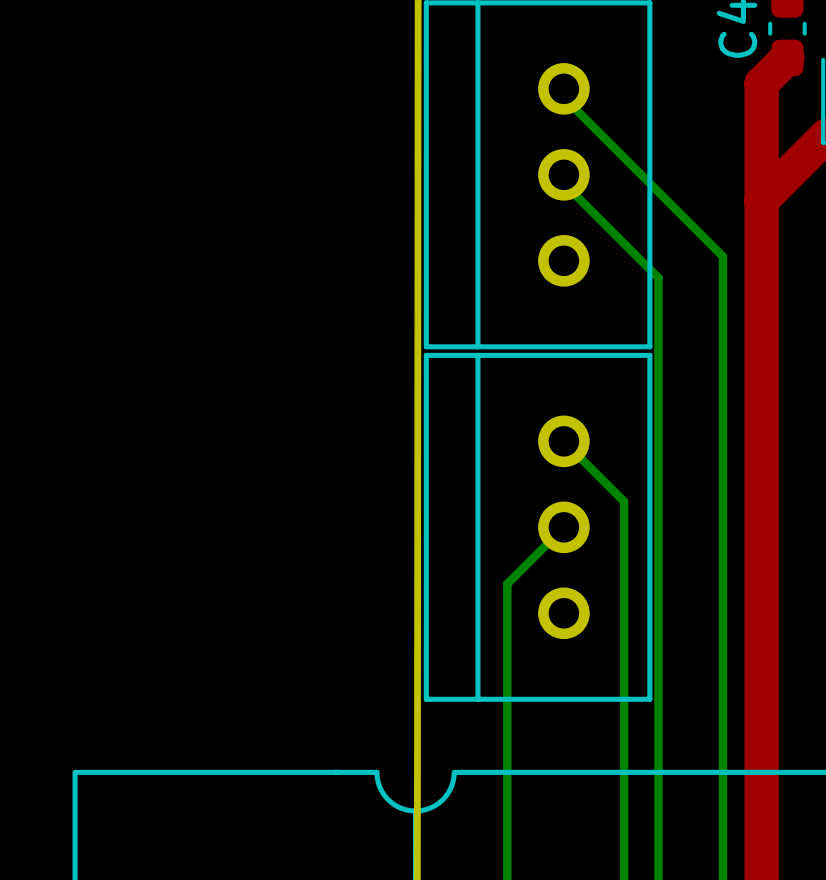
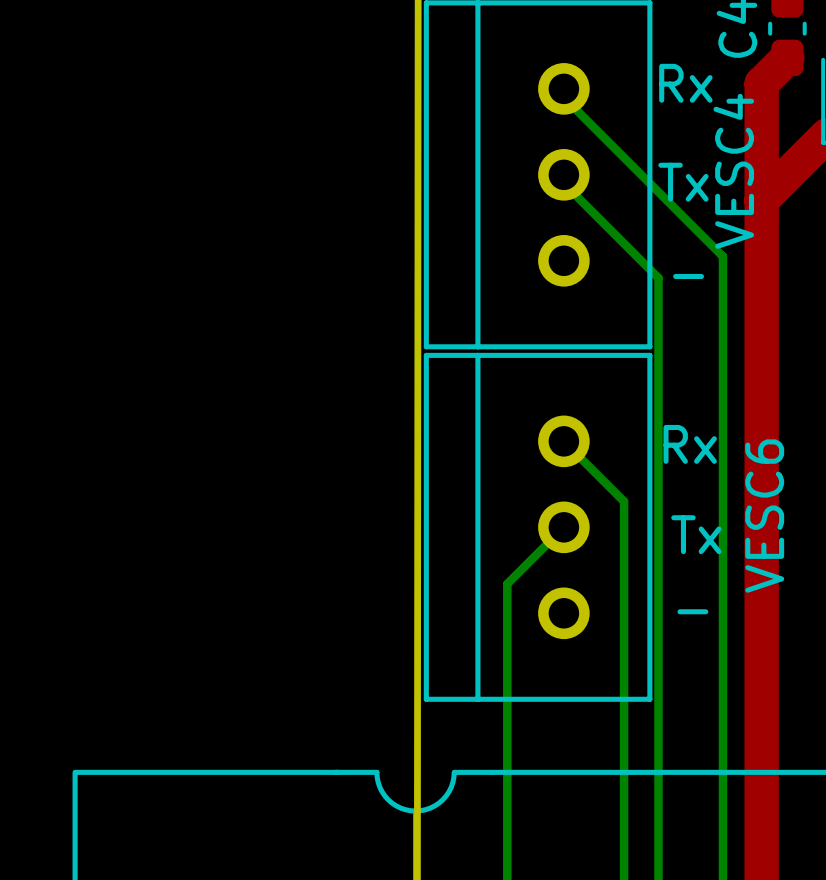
text: none -> Rx (685, 83)
text: none -> VESC4 (733, 171)
text: none -> Tx (683, 182)
text: none -> - (688, 276)
text: none -> Rx (690, 444)
text: none -> VESC6 (764, 516)
text: none -> Tx (696, 534)
text: none -> - (692, 611)

